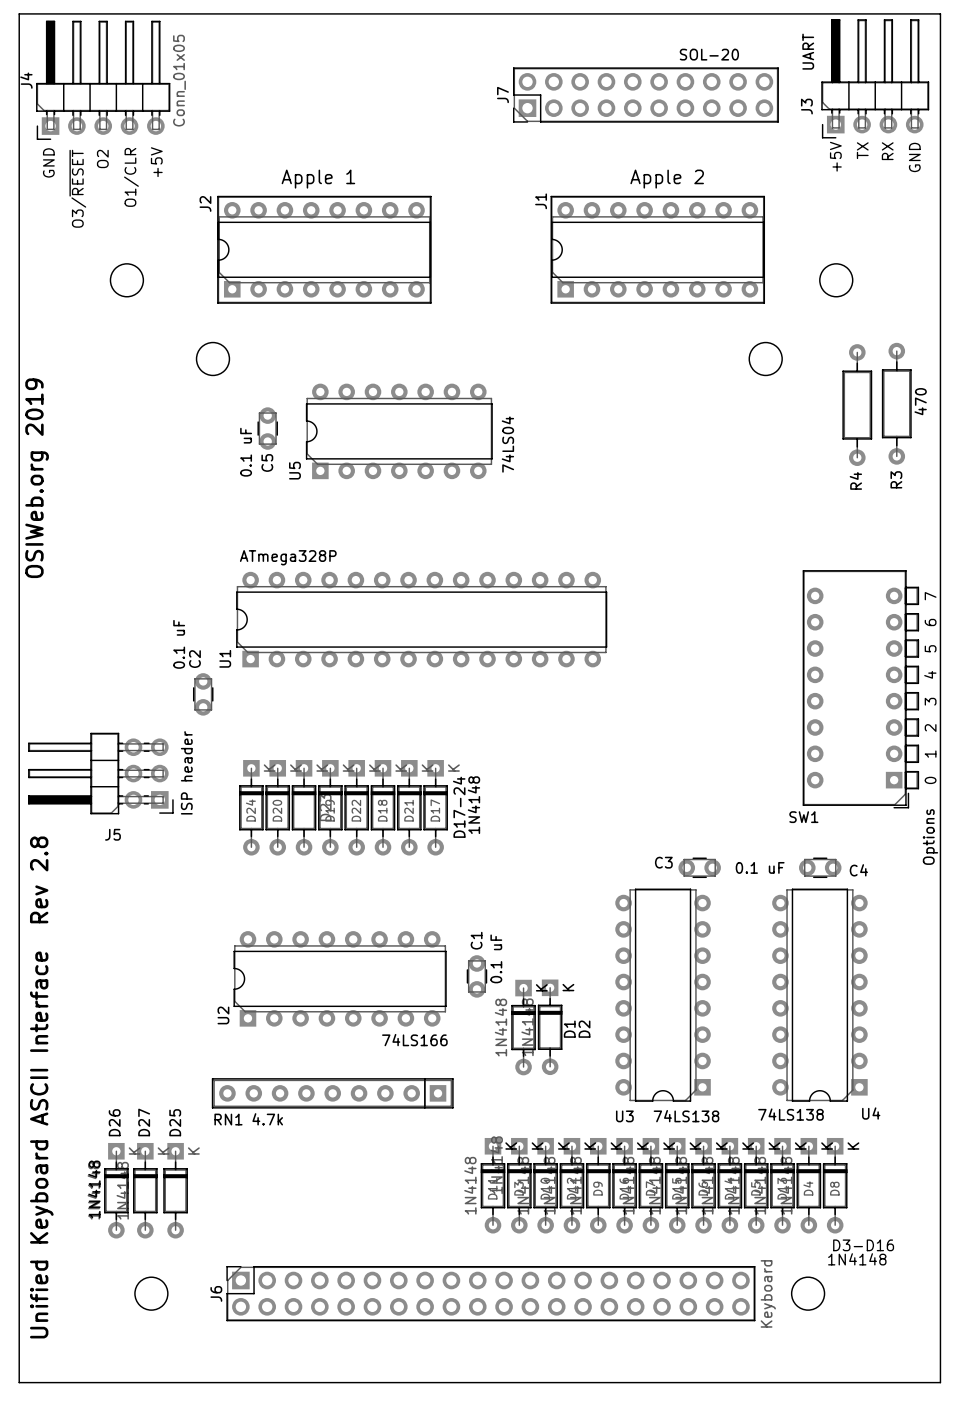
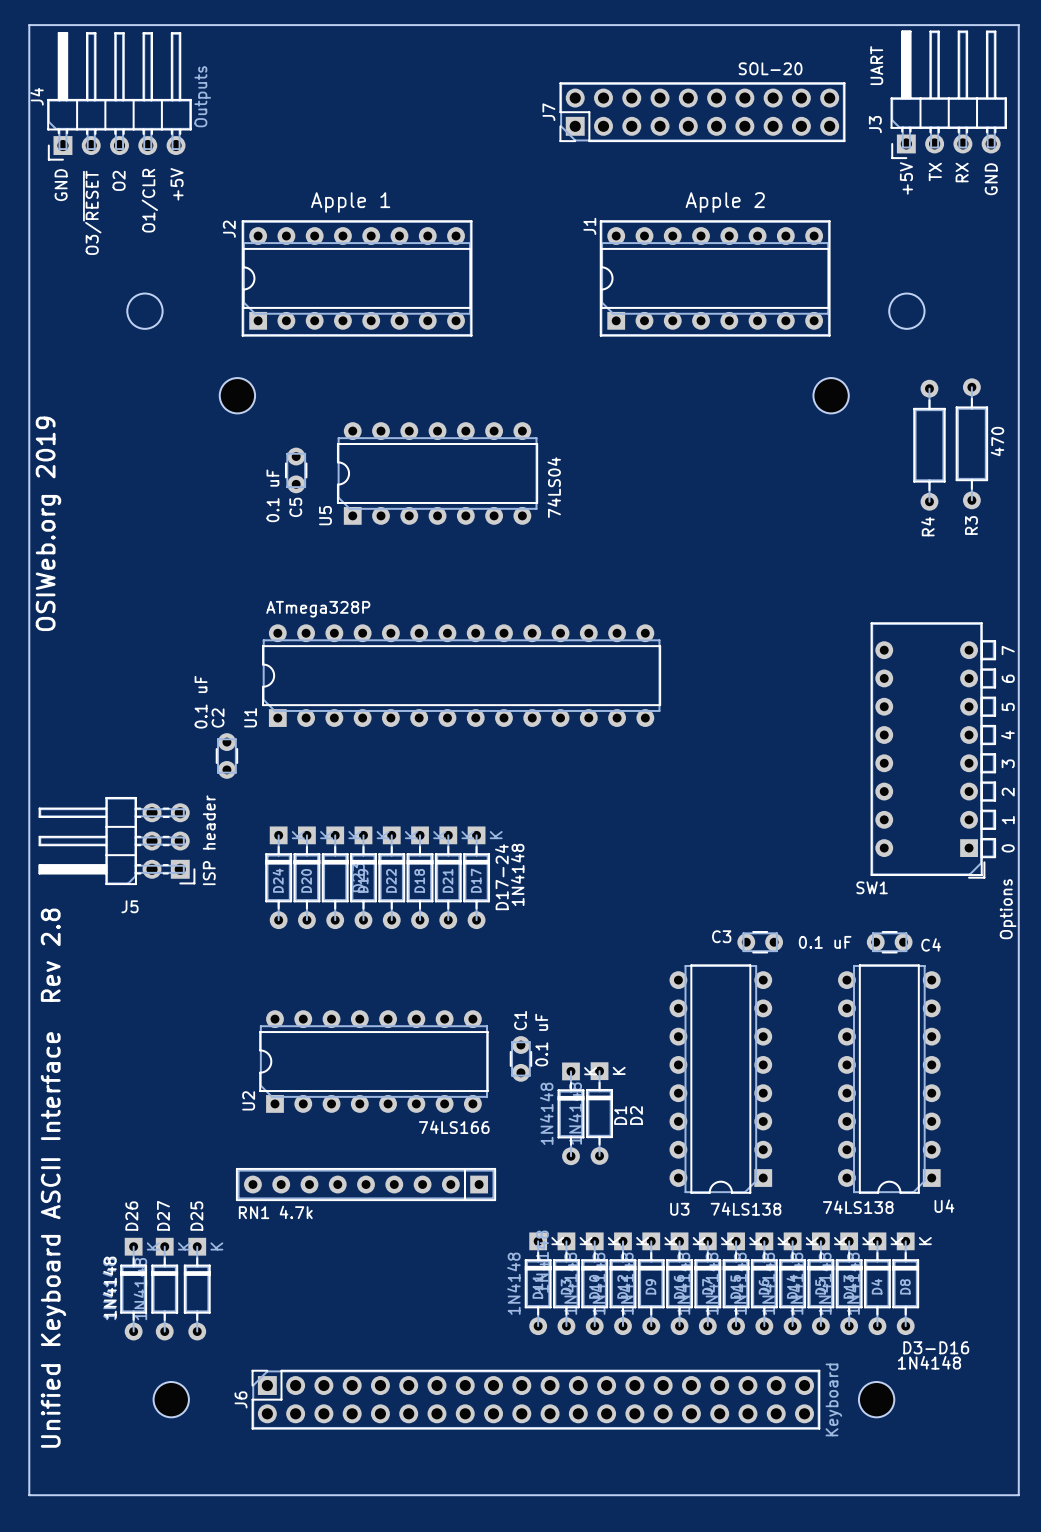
J4 value: Conn_01x05 (179, 80) -> Outputs (202, 96)

